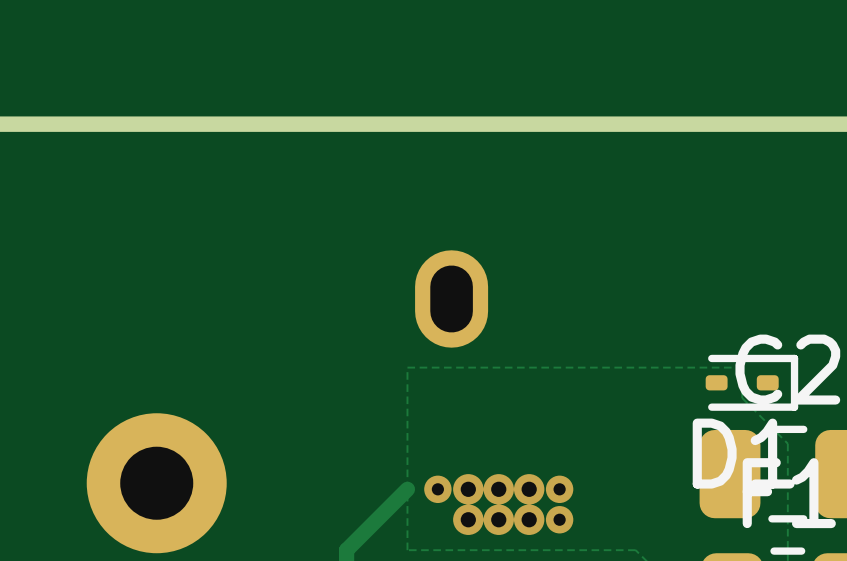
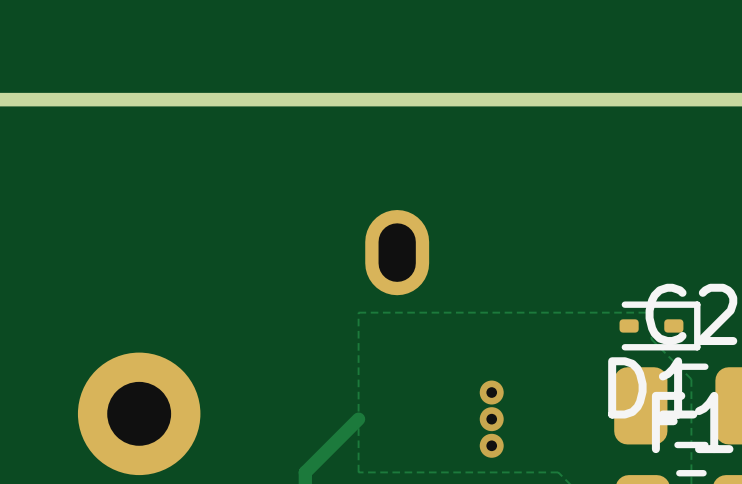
via position: (437, 489) -> (491, 392)
via: (468, 489) -> none
via: (498, 489) -> none
via: (529, 489) -> none
via: (468, 519) -> none
via: (498, 519) -> none
via: (529, 519) -> none

